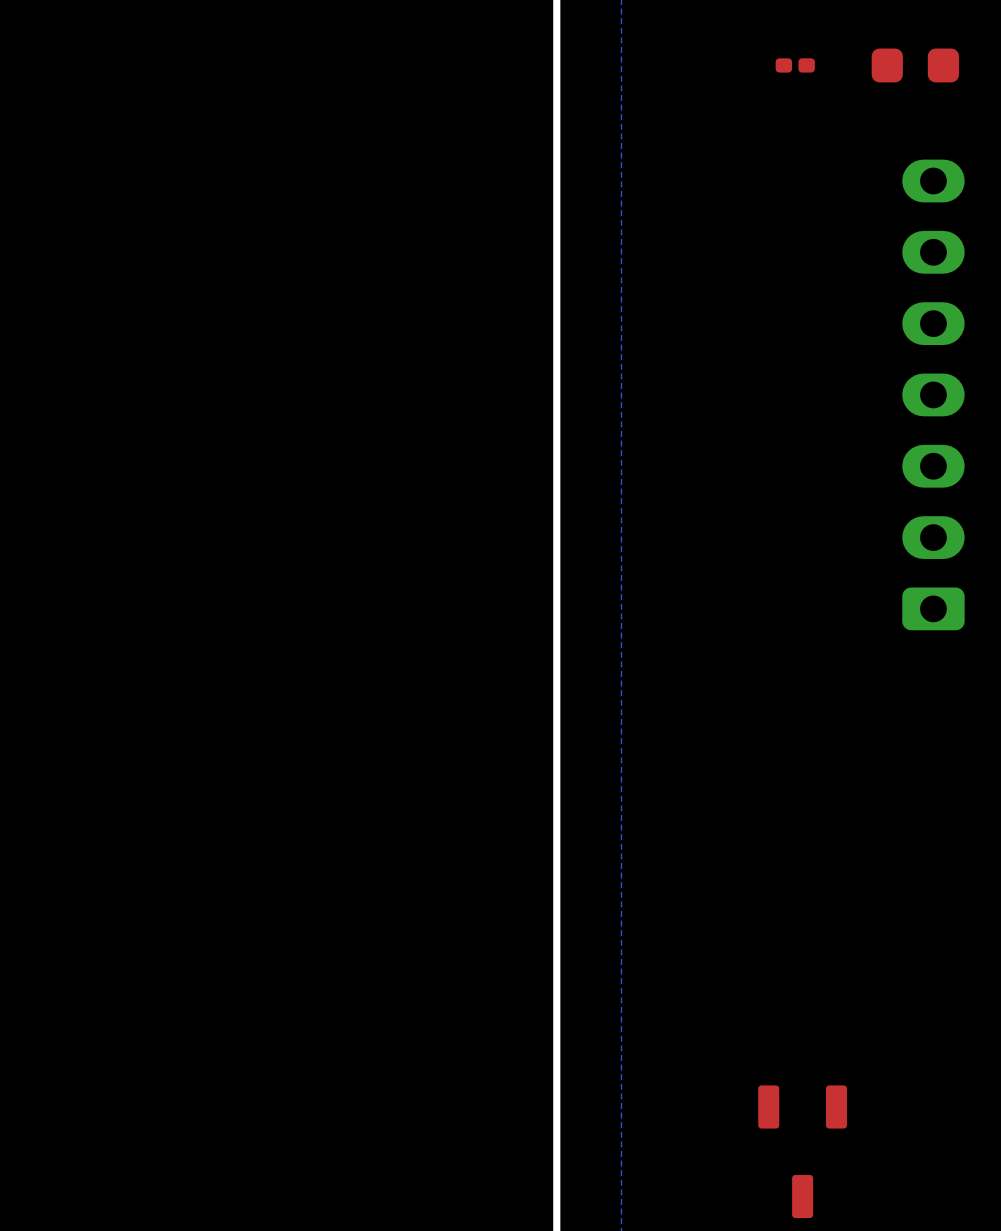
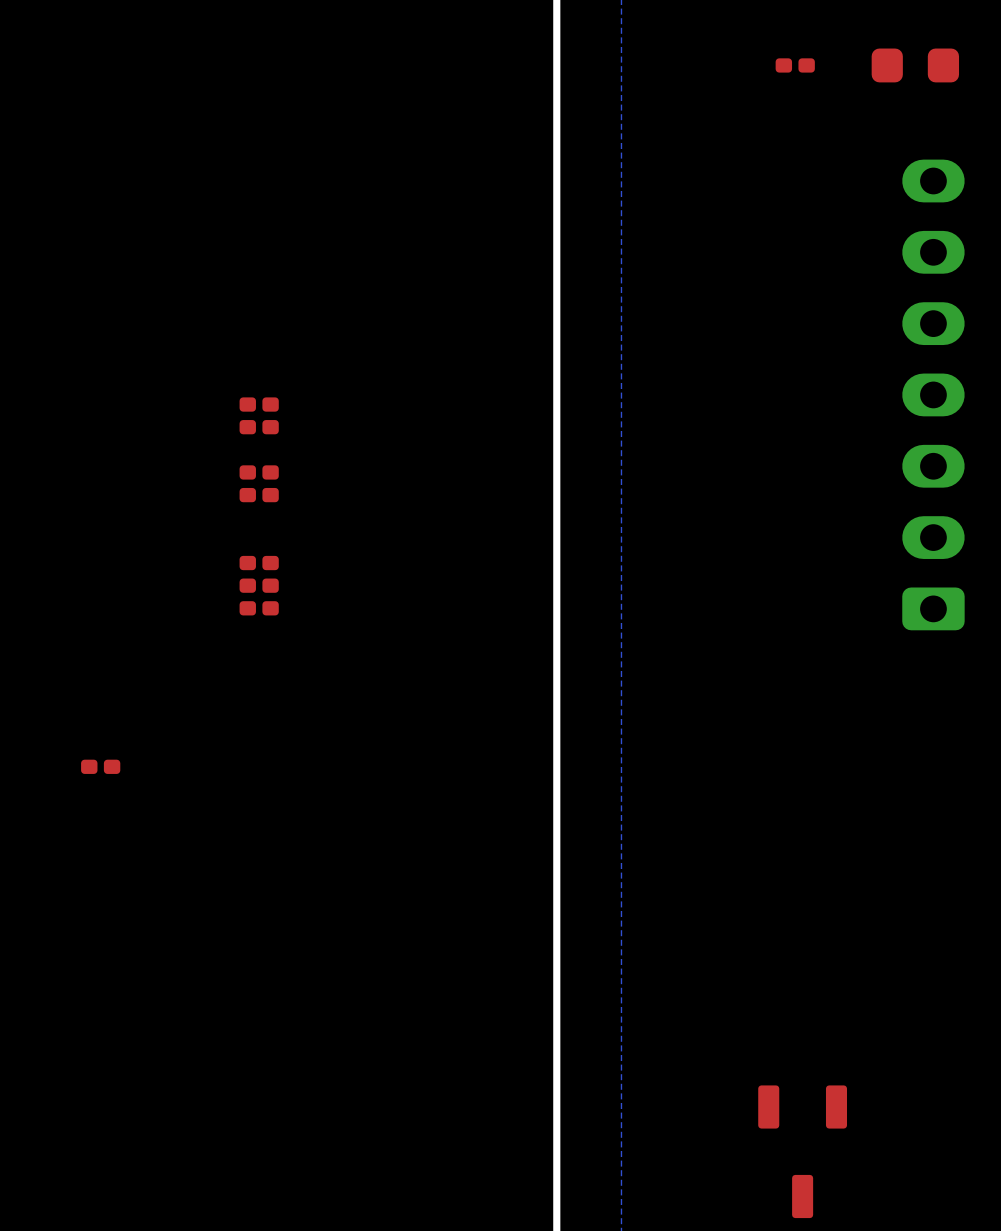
part: none -> (259, 404)
part: none -> (259, 427)
part: none -> (259, 472)
part: none -> (259, 495)
part: none -> (259, 563)
part: none -> (259, 585)
part: none -> (259, 608)
part: none -> (100, 766)

